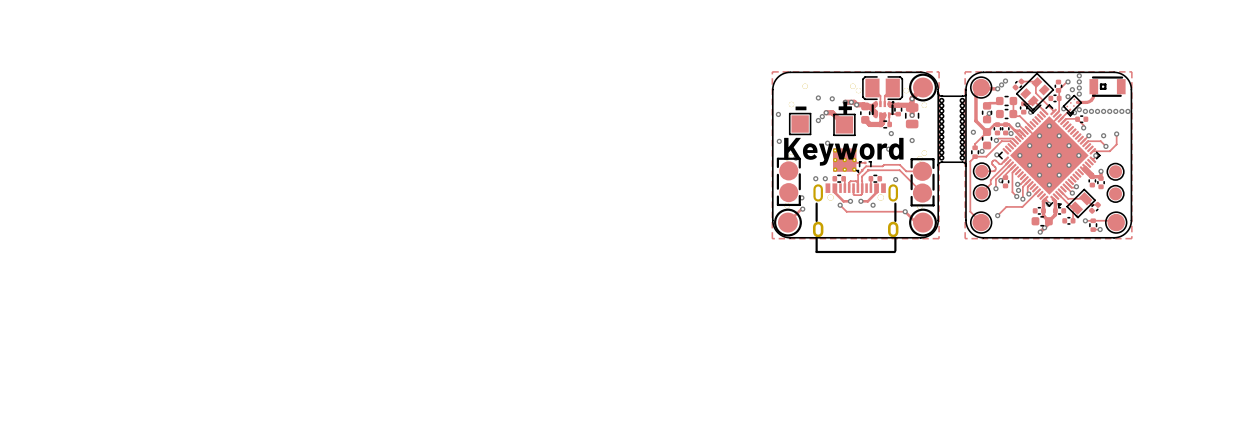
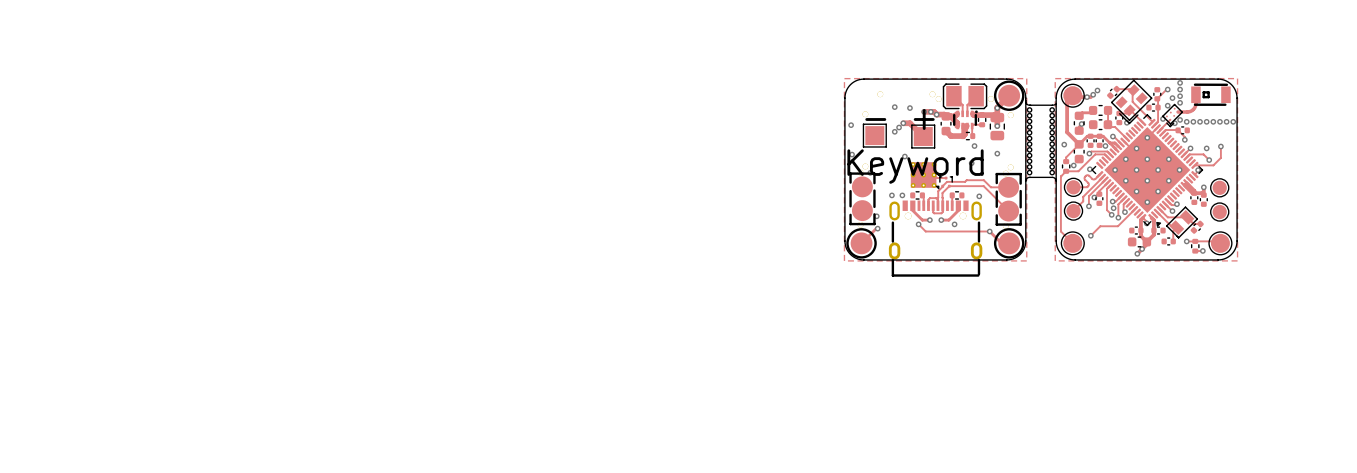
via: (1005, 81) -> none
via: none -> (1097, 90)
via: (1001, 84) -> none
via: none -> (1093, 94)
via: none -> (1087, 97)
via: (997, 88) -> none

